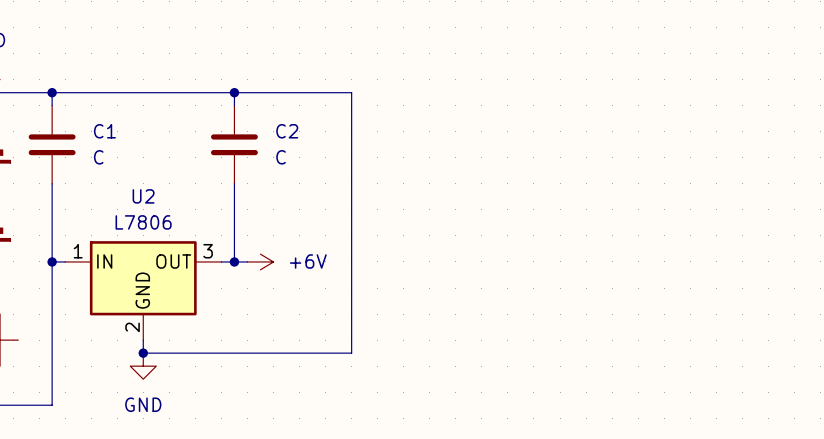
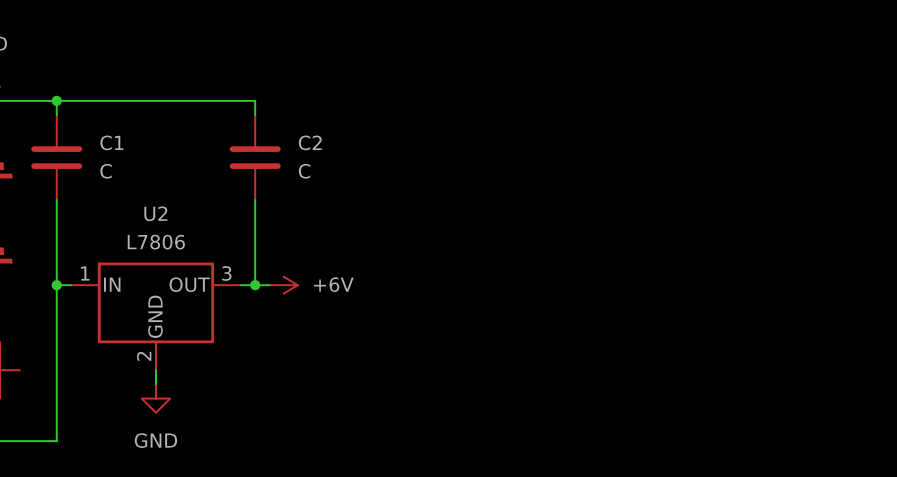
wire: (234, 92) (351, 92) (351, 353) (143, 353) -> none
junction: (234, 92) -> none
junction: (143, 353) -> none

